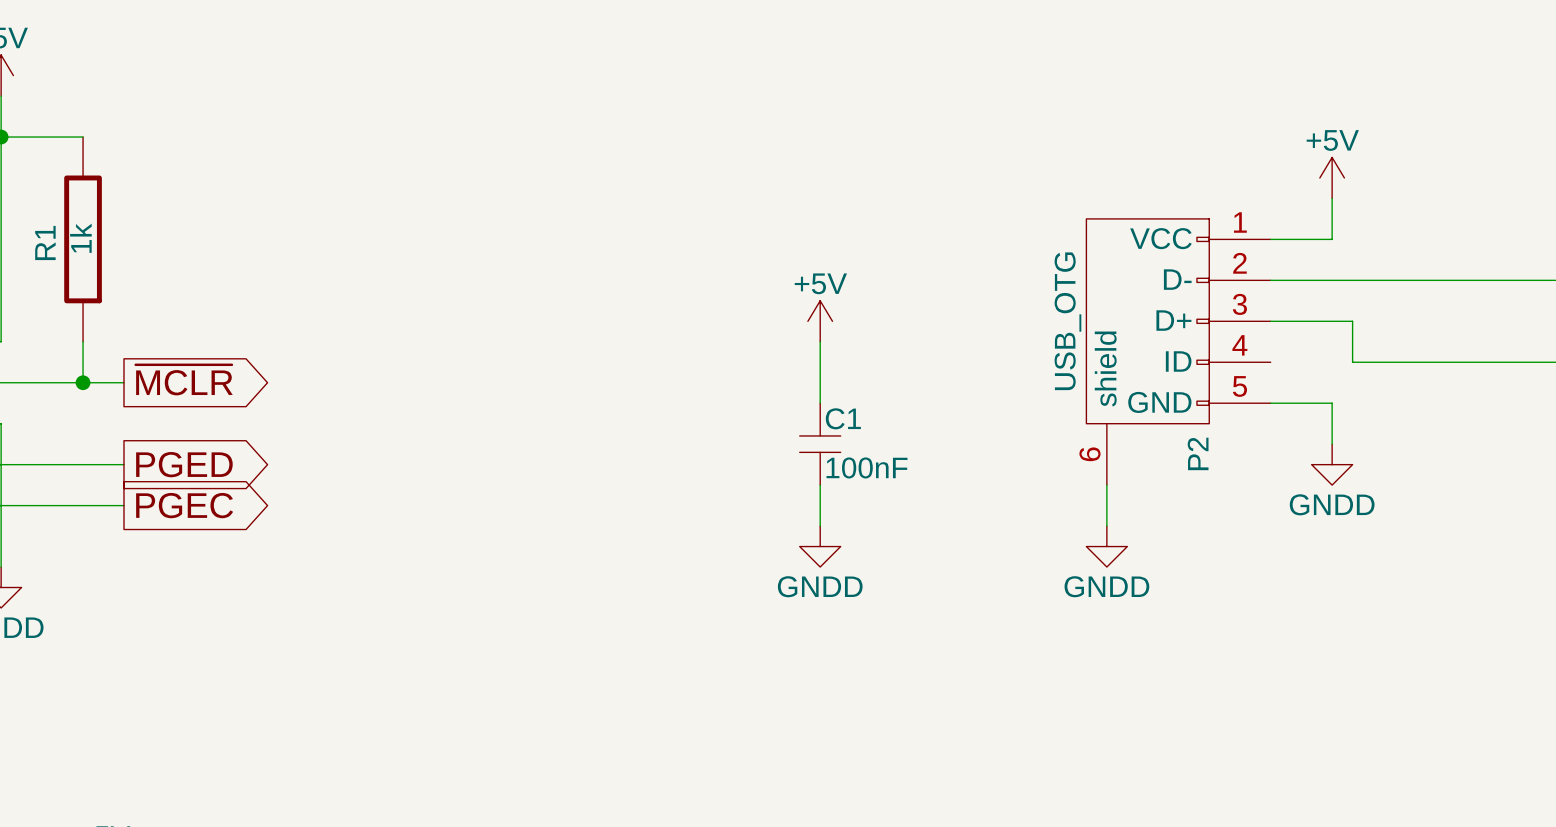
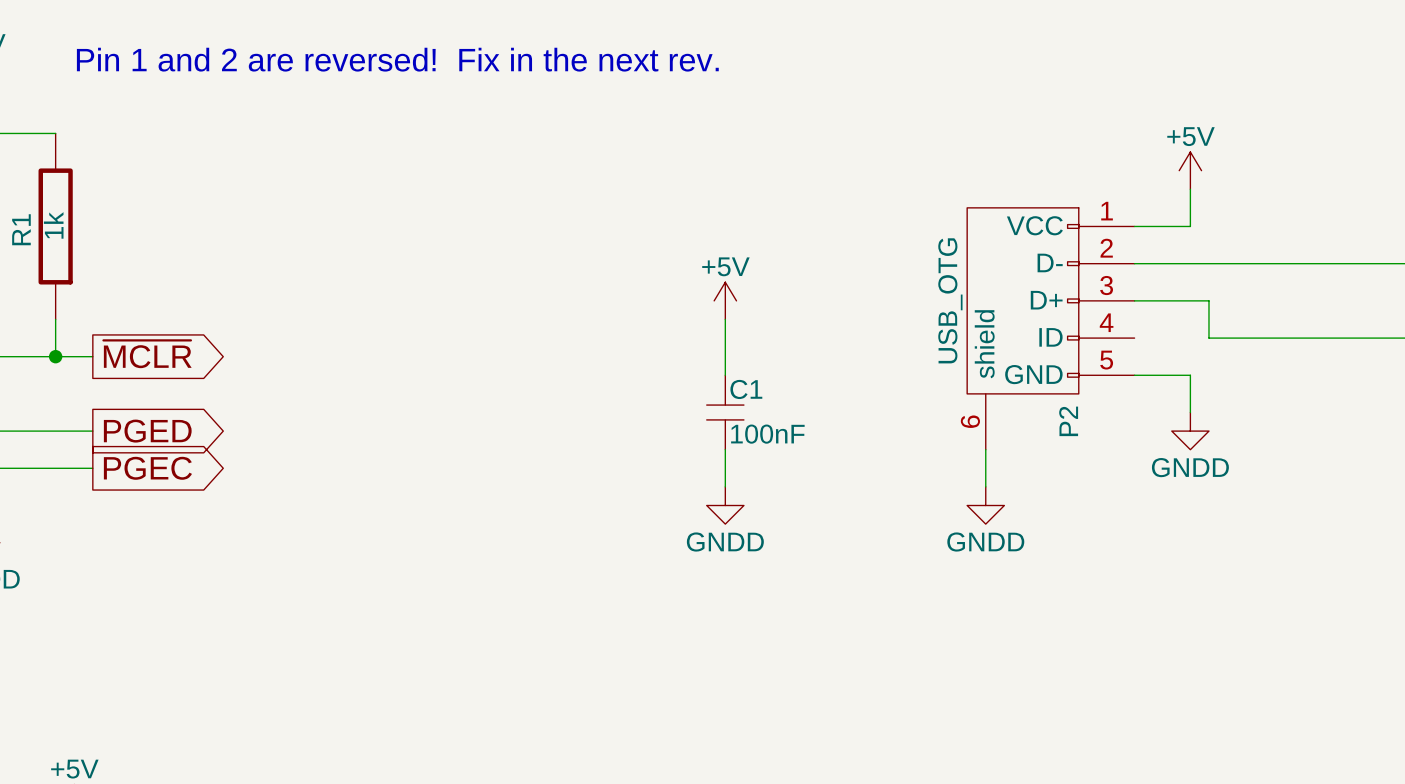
text: none -> Pin 1 and 2 are reversed! Fix in the next rev. (397, 59)

